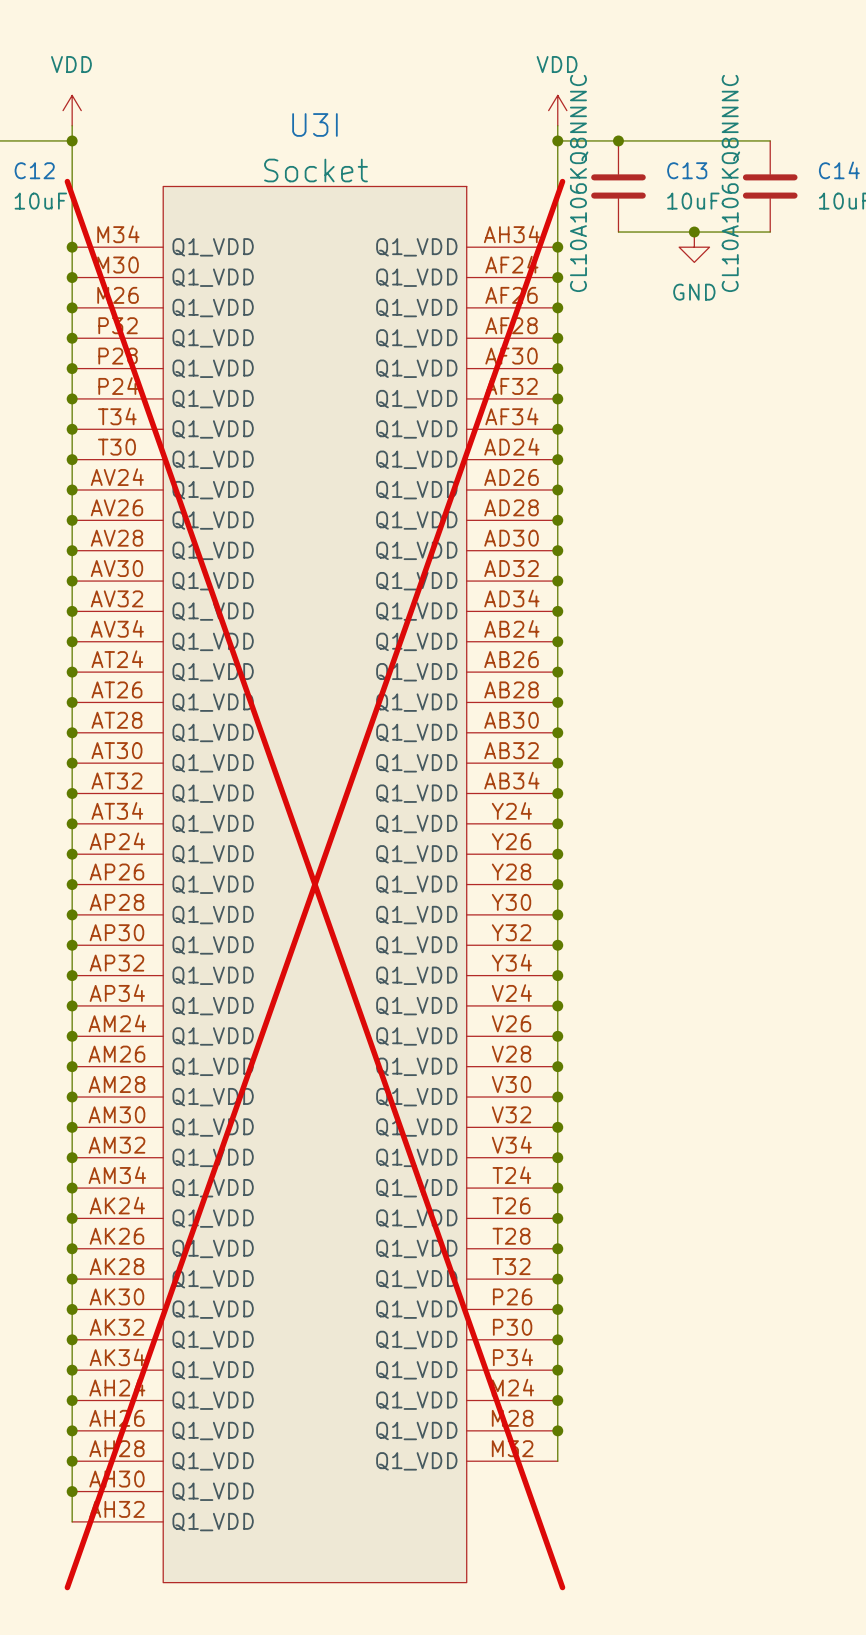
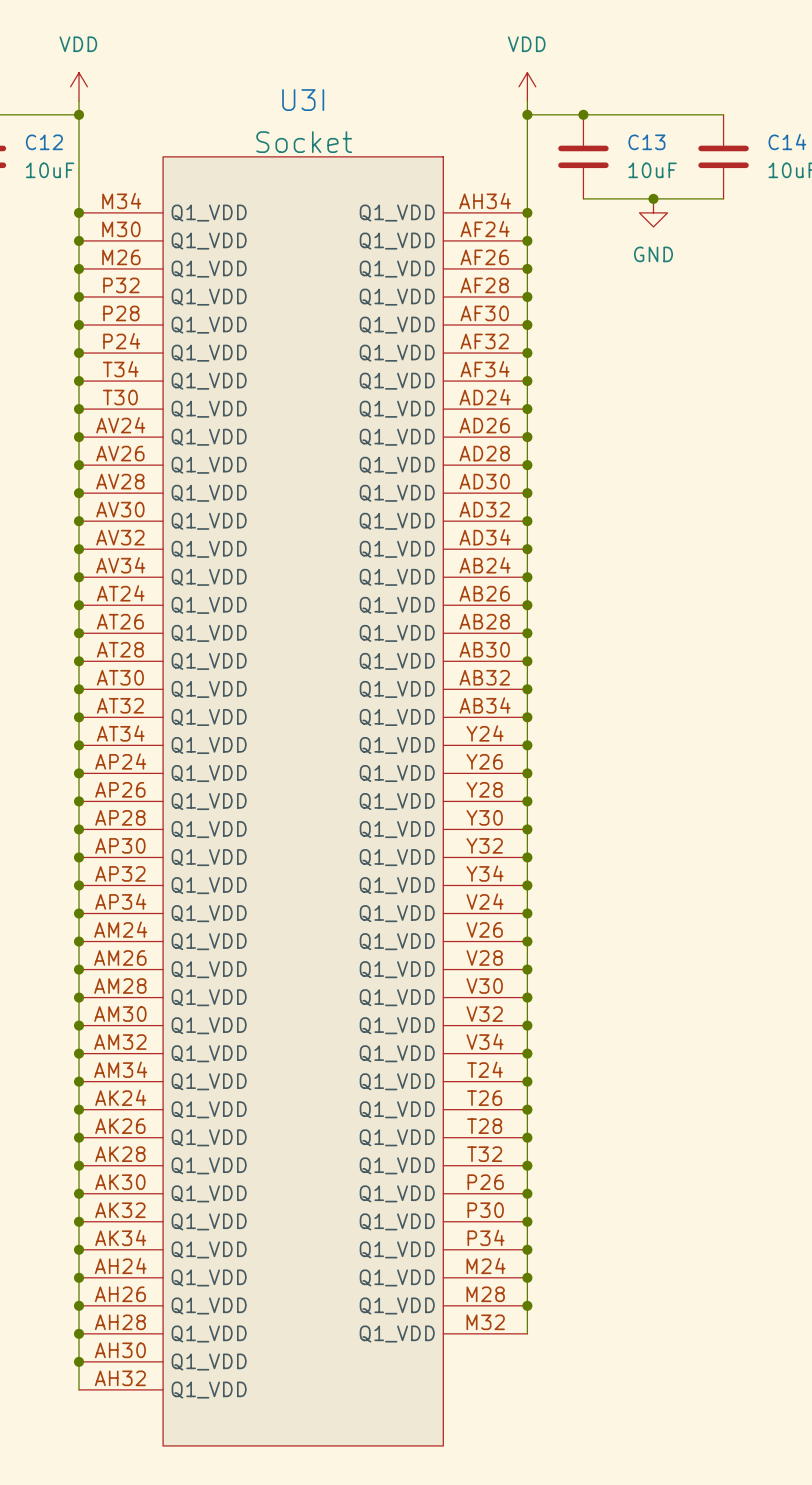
C13 text: CL10A106KQ8NNNC (579, 183) -> none
C14 text: CL10A106KQ8NNNC (730, 183) -> none
U3I do-not-place cross: (314, 884) -> none

